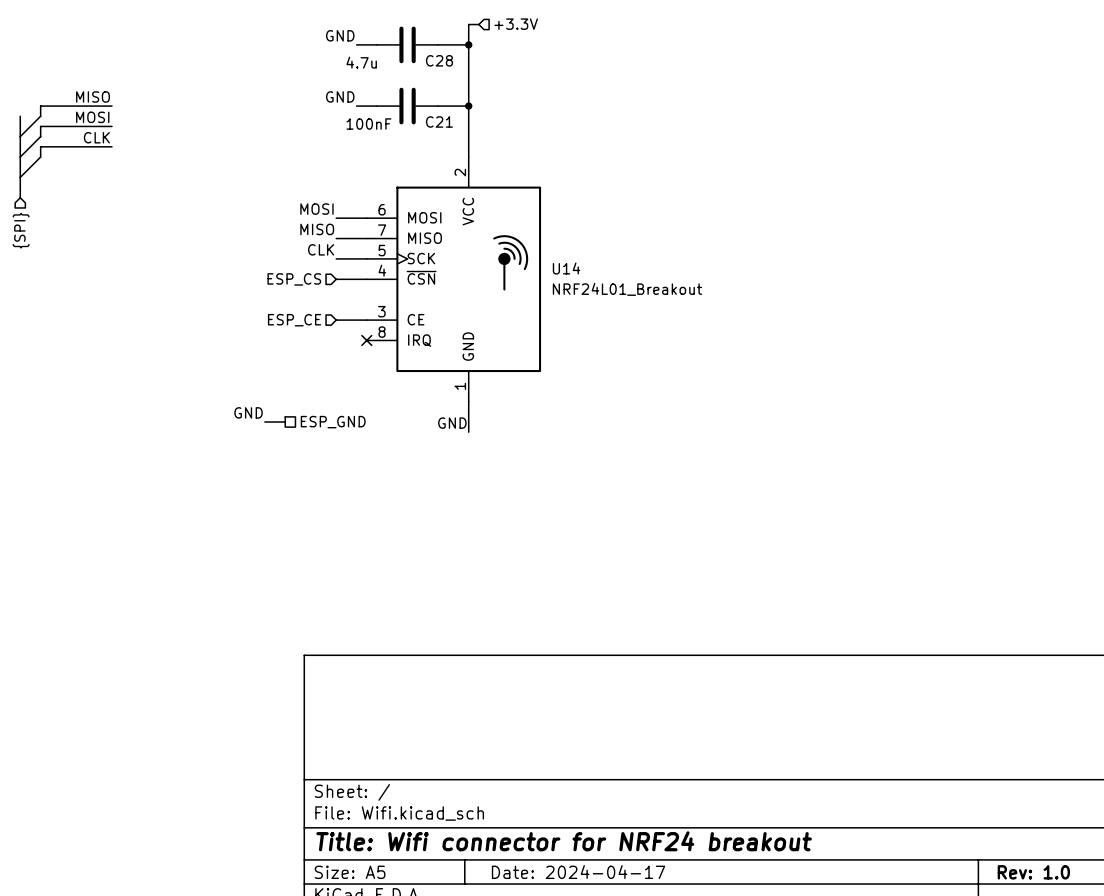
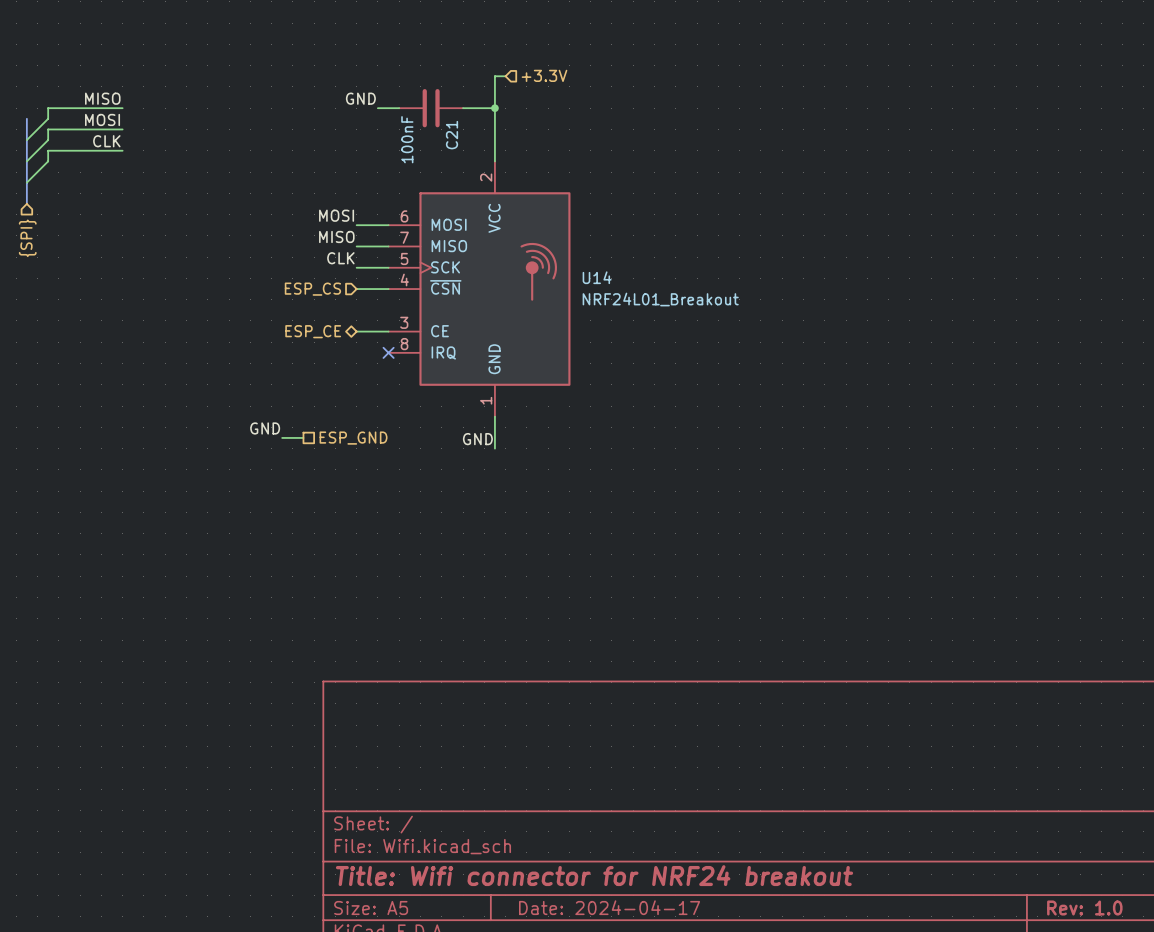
wire: (478, 24) (468, 24) (468, 75) -> (505, 76) (494, 76)
hierarchical label position: +3.3V (516, 24) -> +3.3V (544, 75)
label: GND (340, 35) -> none
wire: (356, 44) (376, 44) -> none
C28: 4.7u (407, 44) -> none
wire: (438, 44) (468, 44) -> none
junction: (468, 44) -> none
C21 name rotation: 0° (439, 121) -> 90° counterclockwise (452, 135)
C21 value rotation: 0° (368, 124) -> 90° counterclockwise (407, 139)
hierarchical label shape: input (294, 320) -> bidirectional (313, 331)

